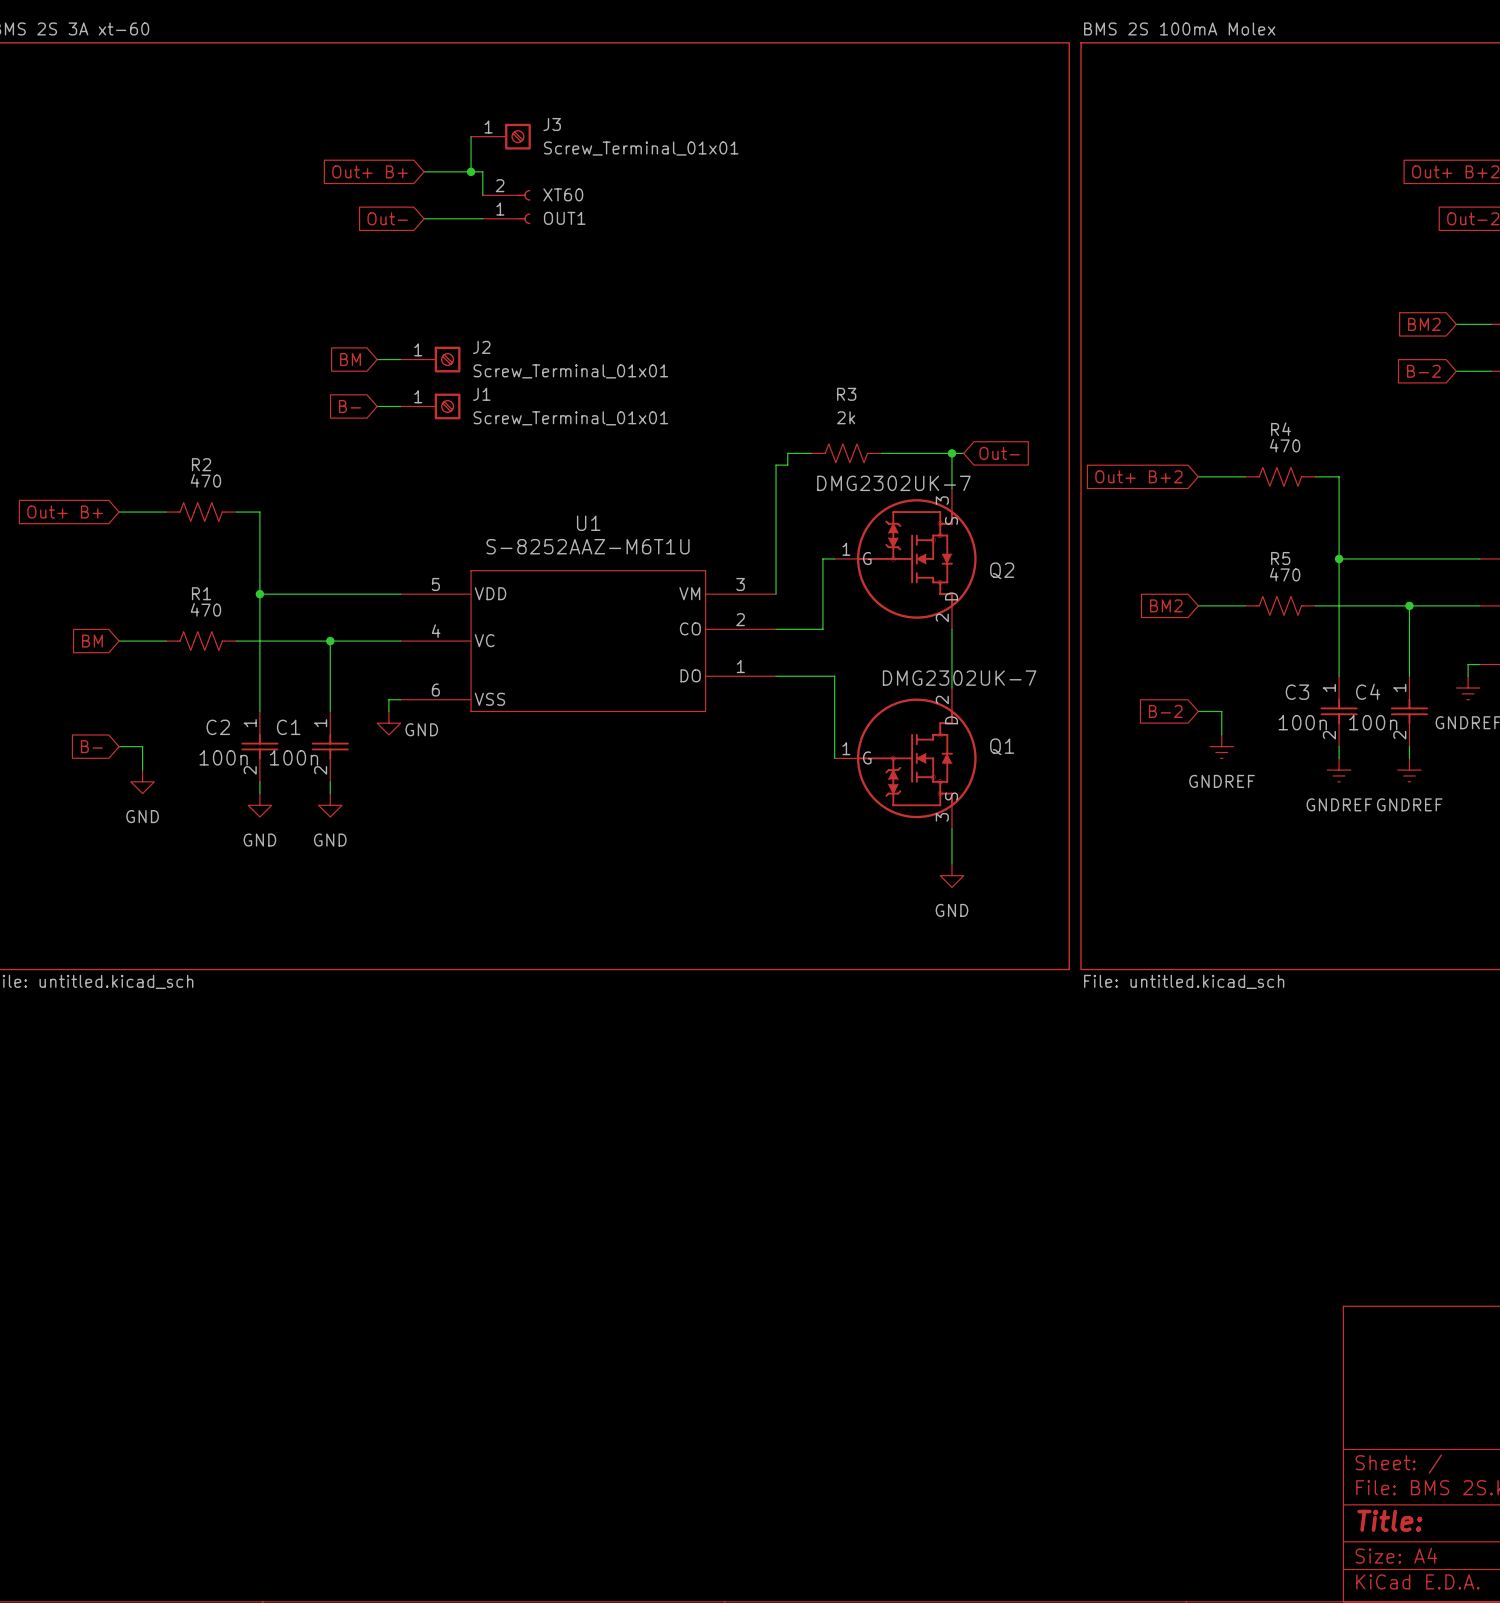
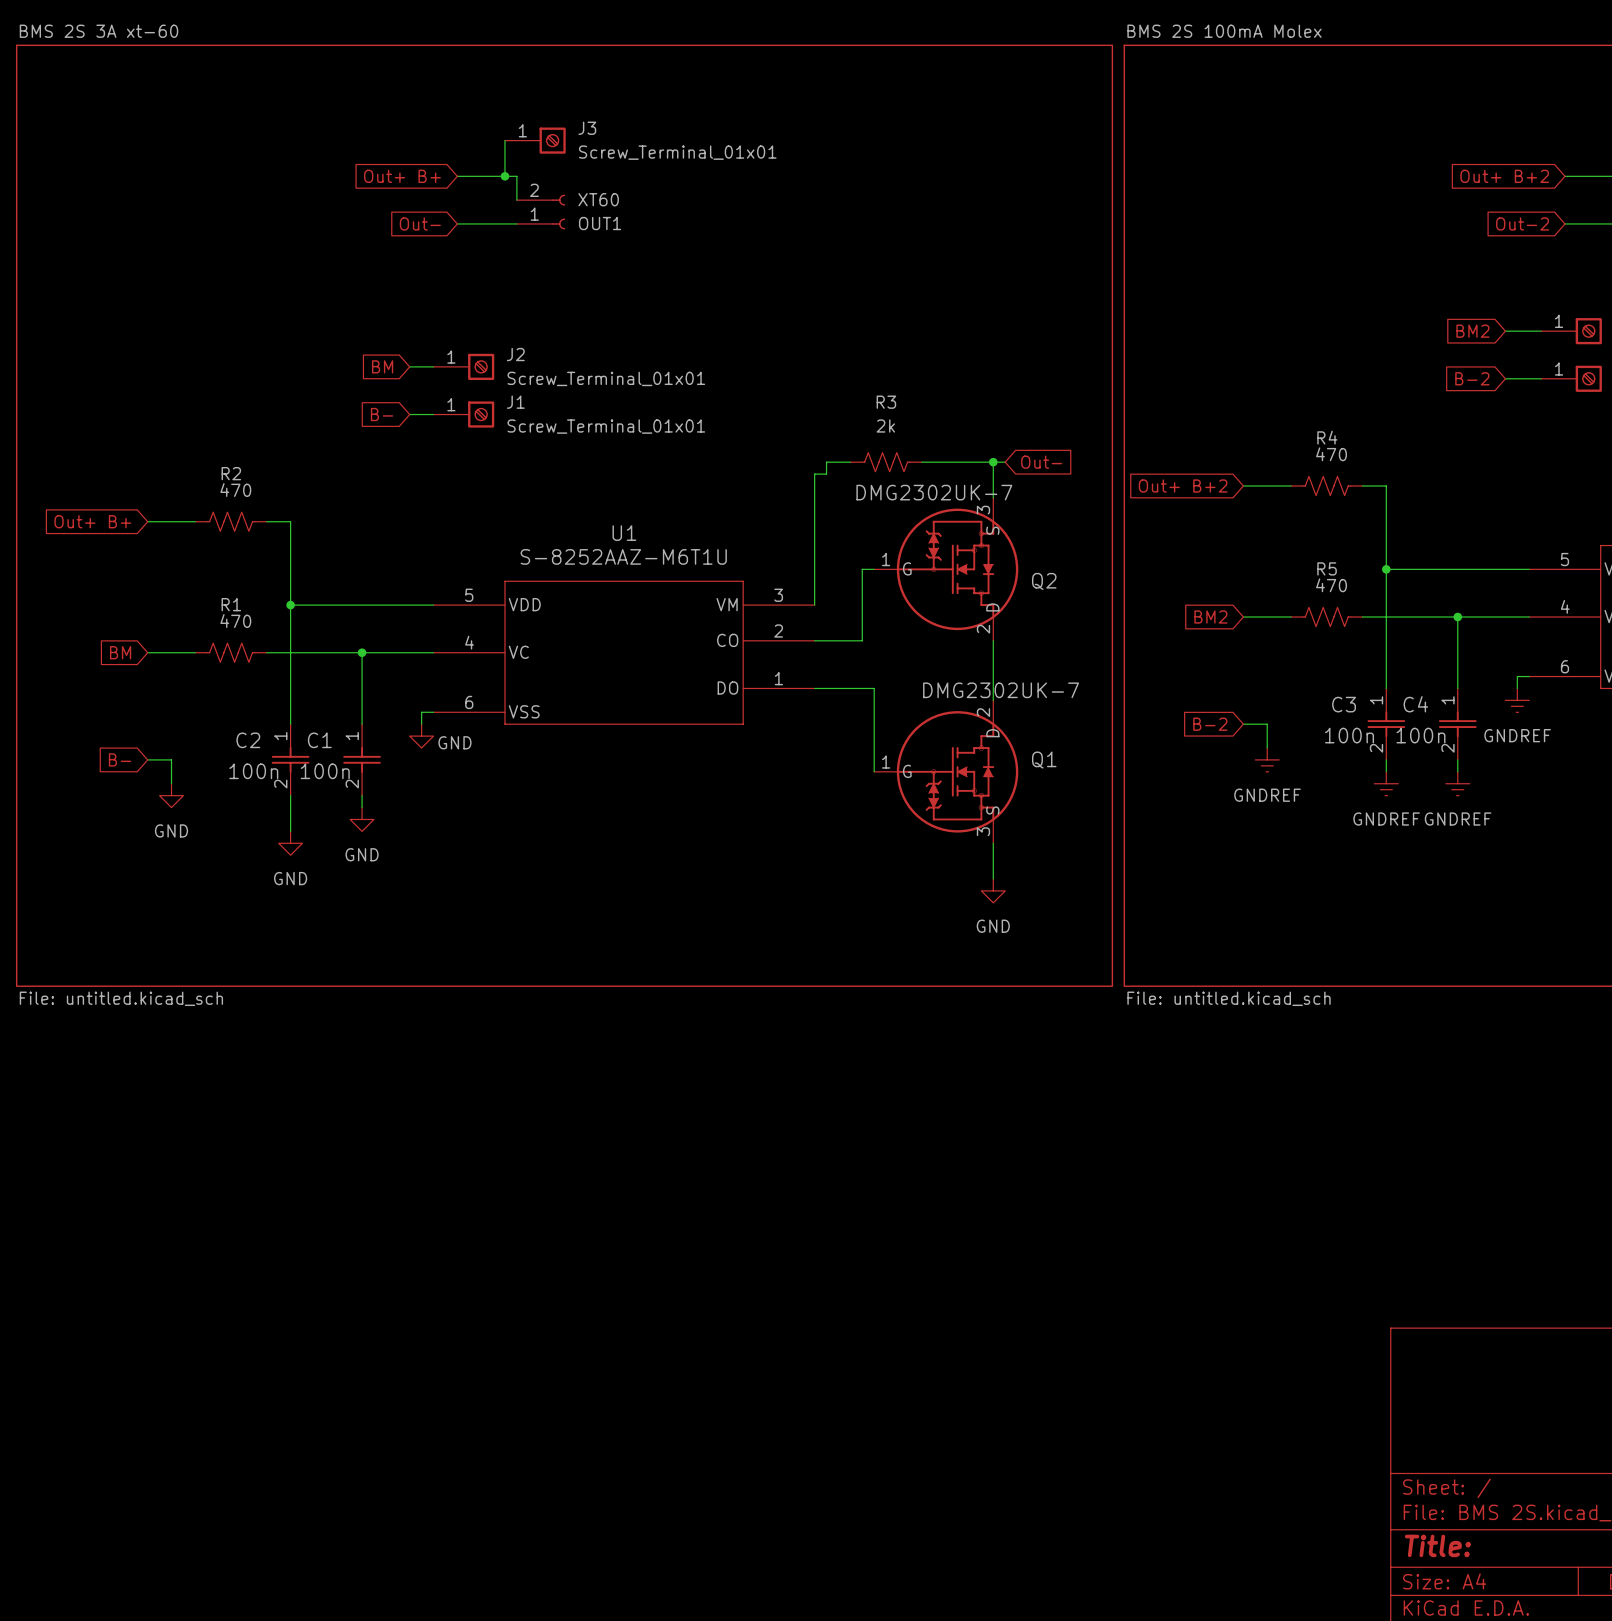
power symbol position: GND (259, 805) -> GND (290, 843)

